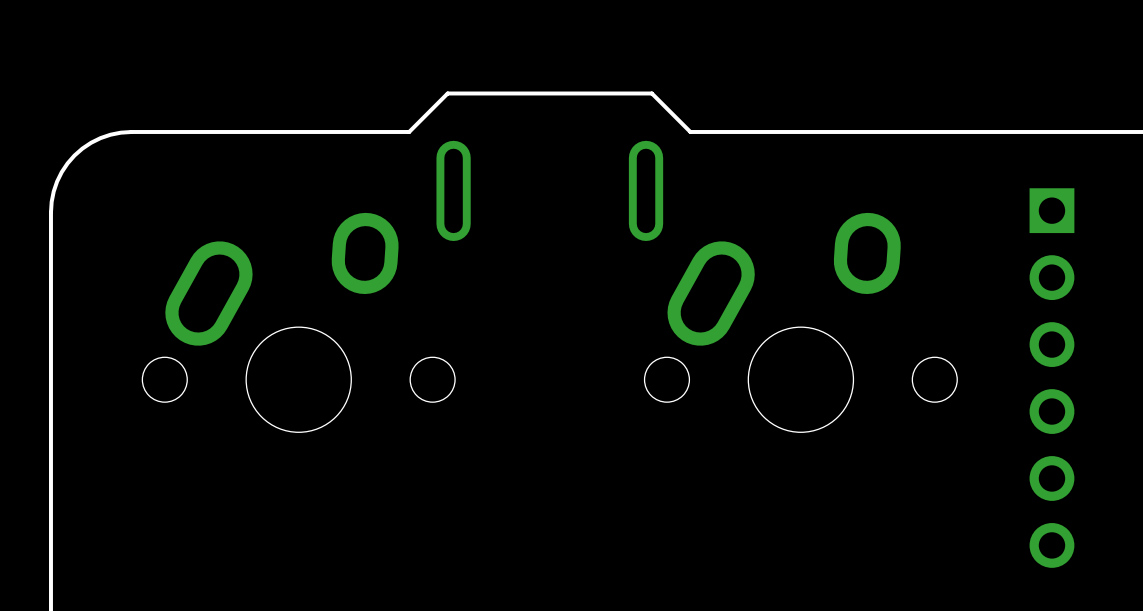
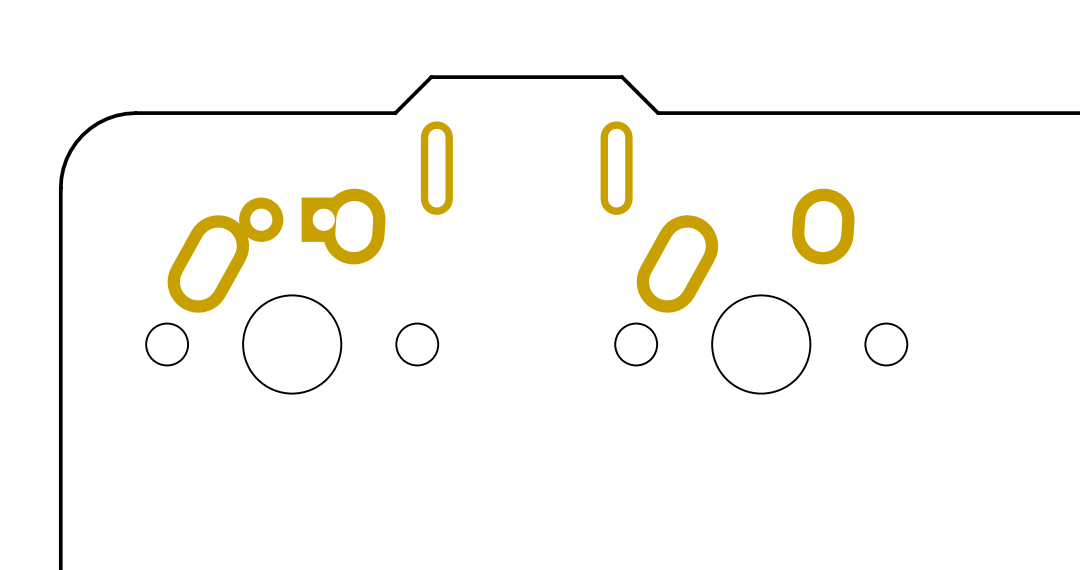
part: none -> (292, 219)
part: (1051, 378) -> none

